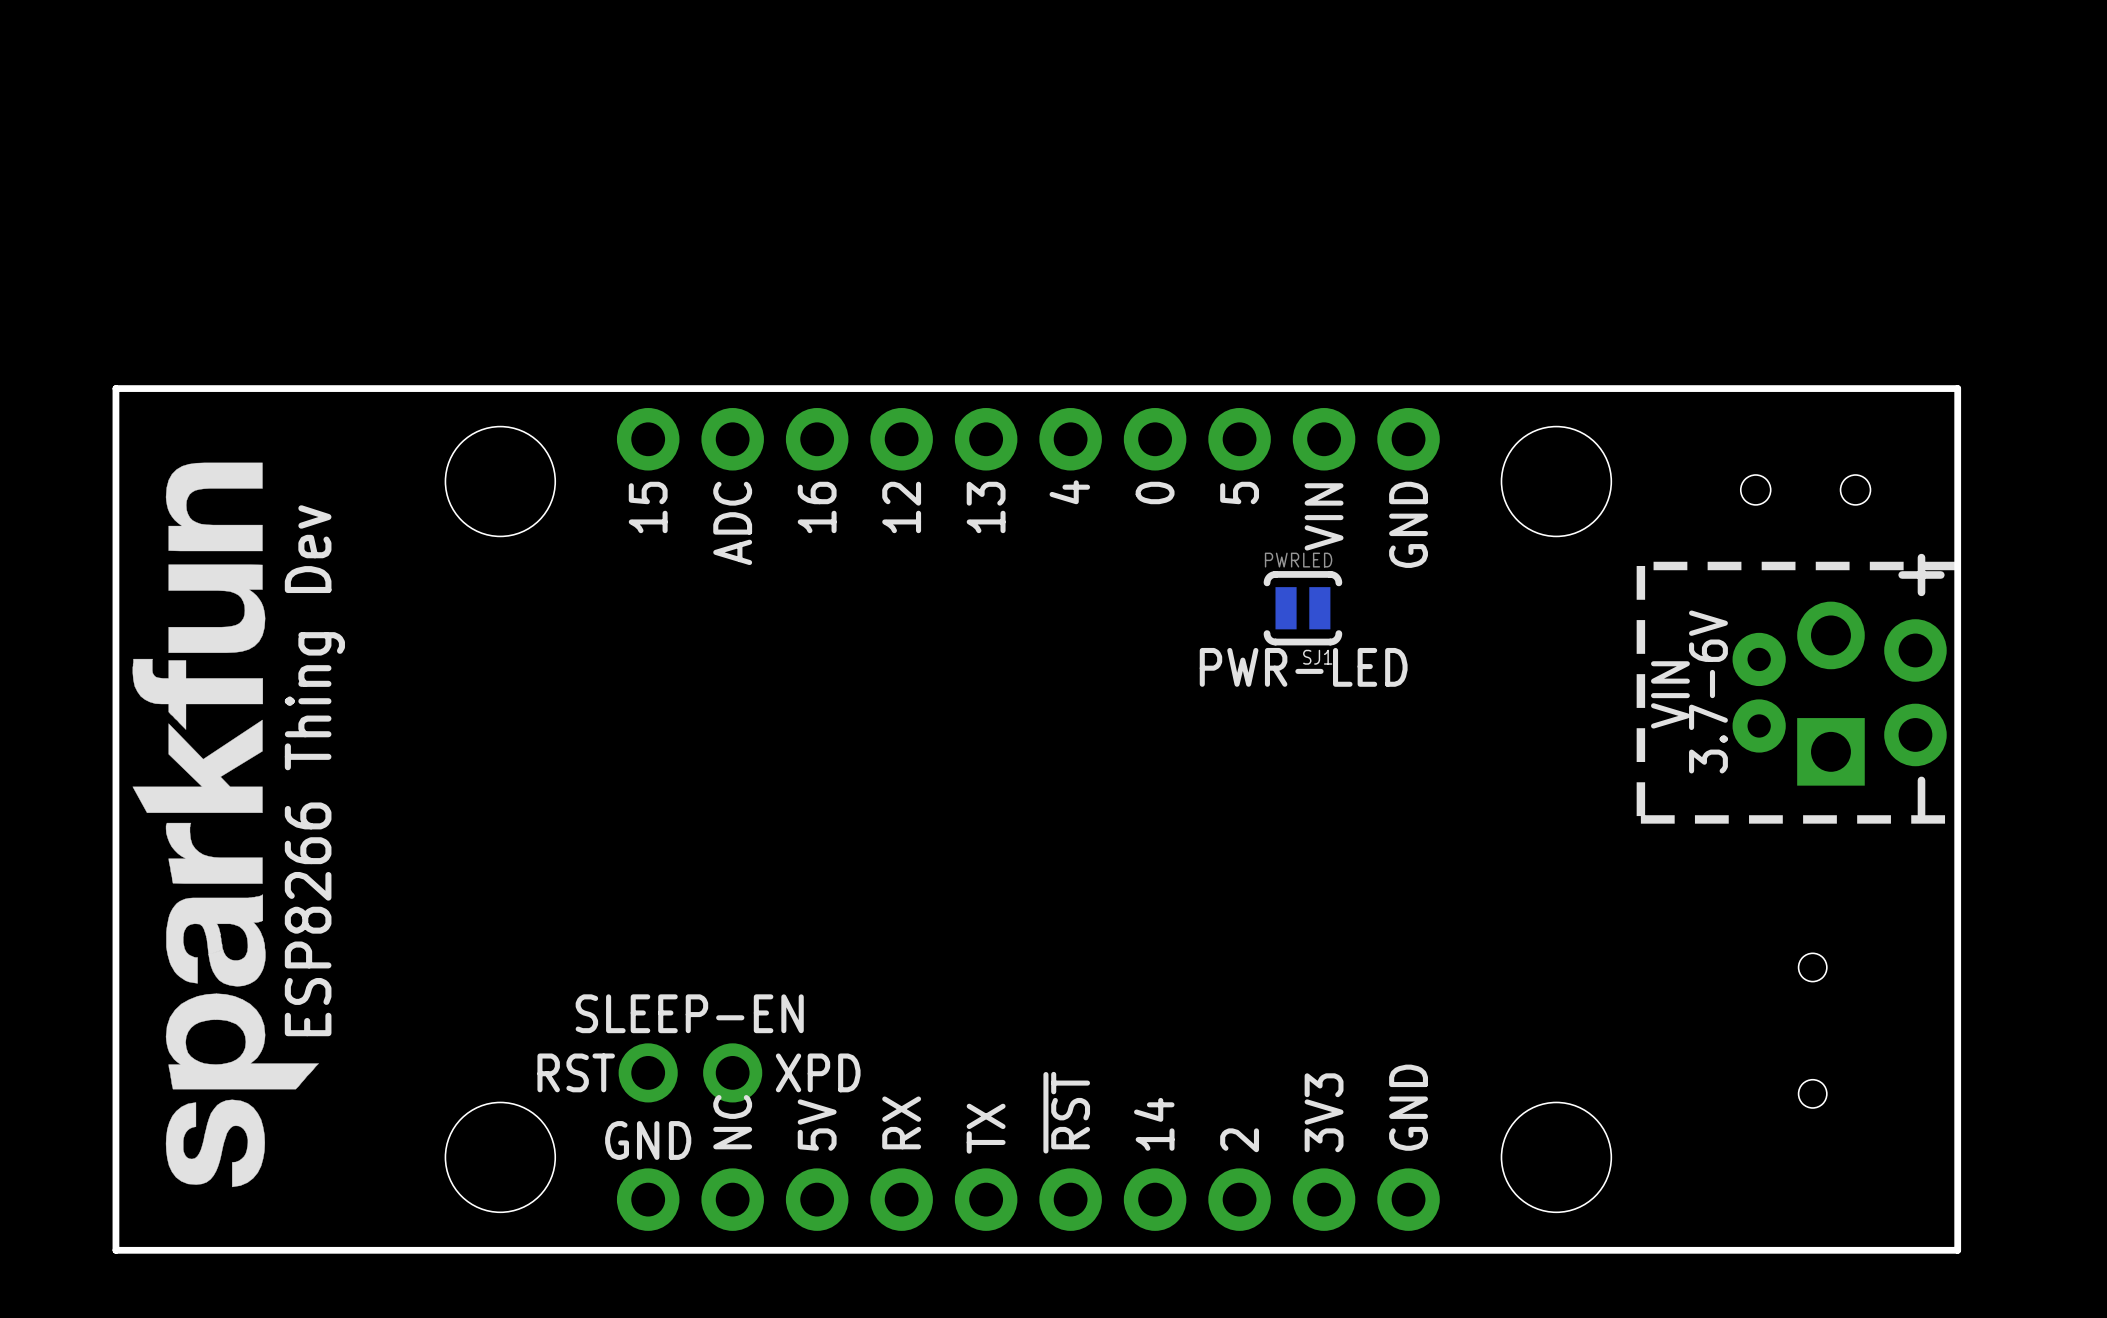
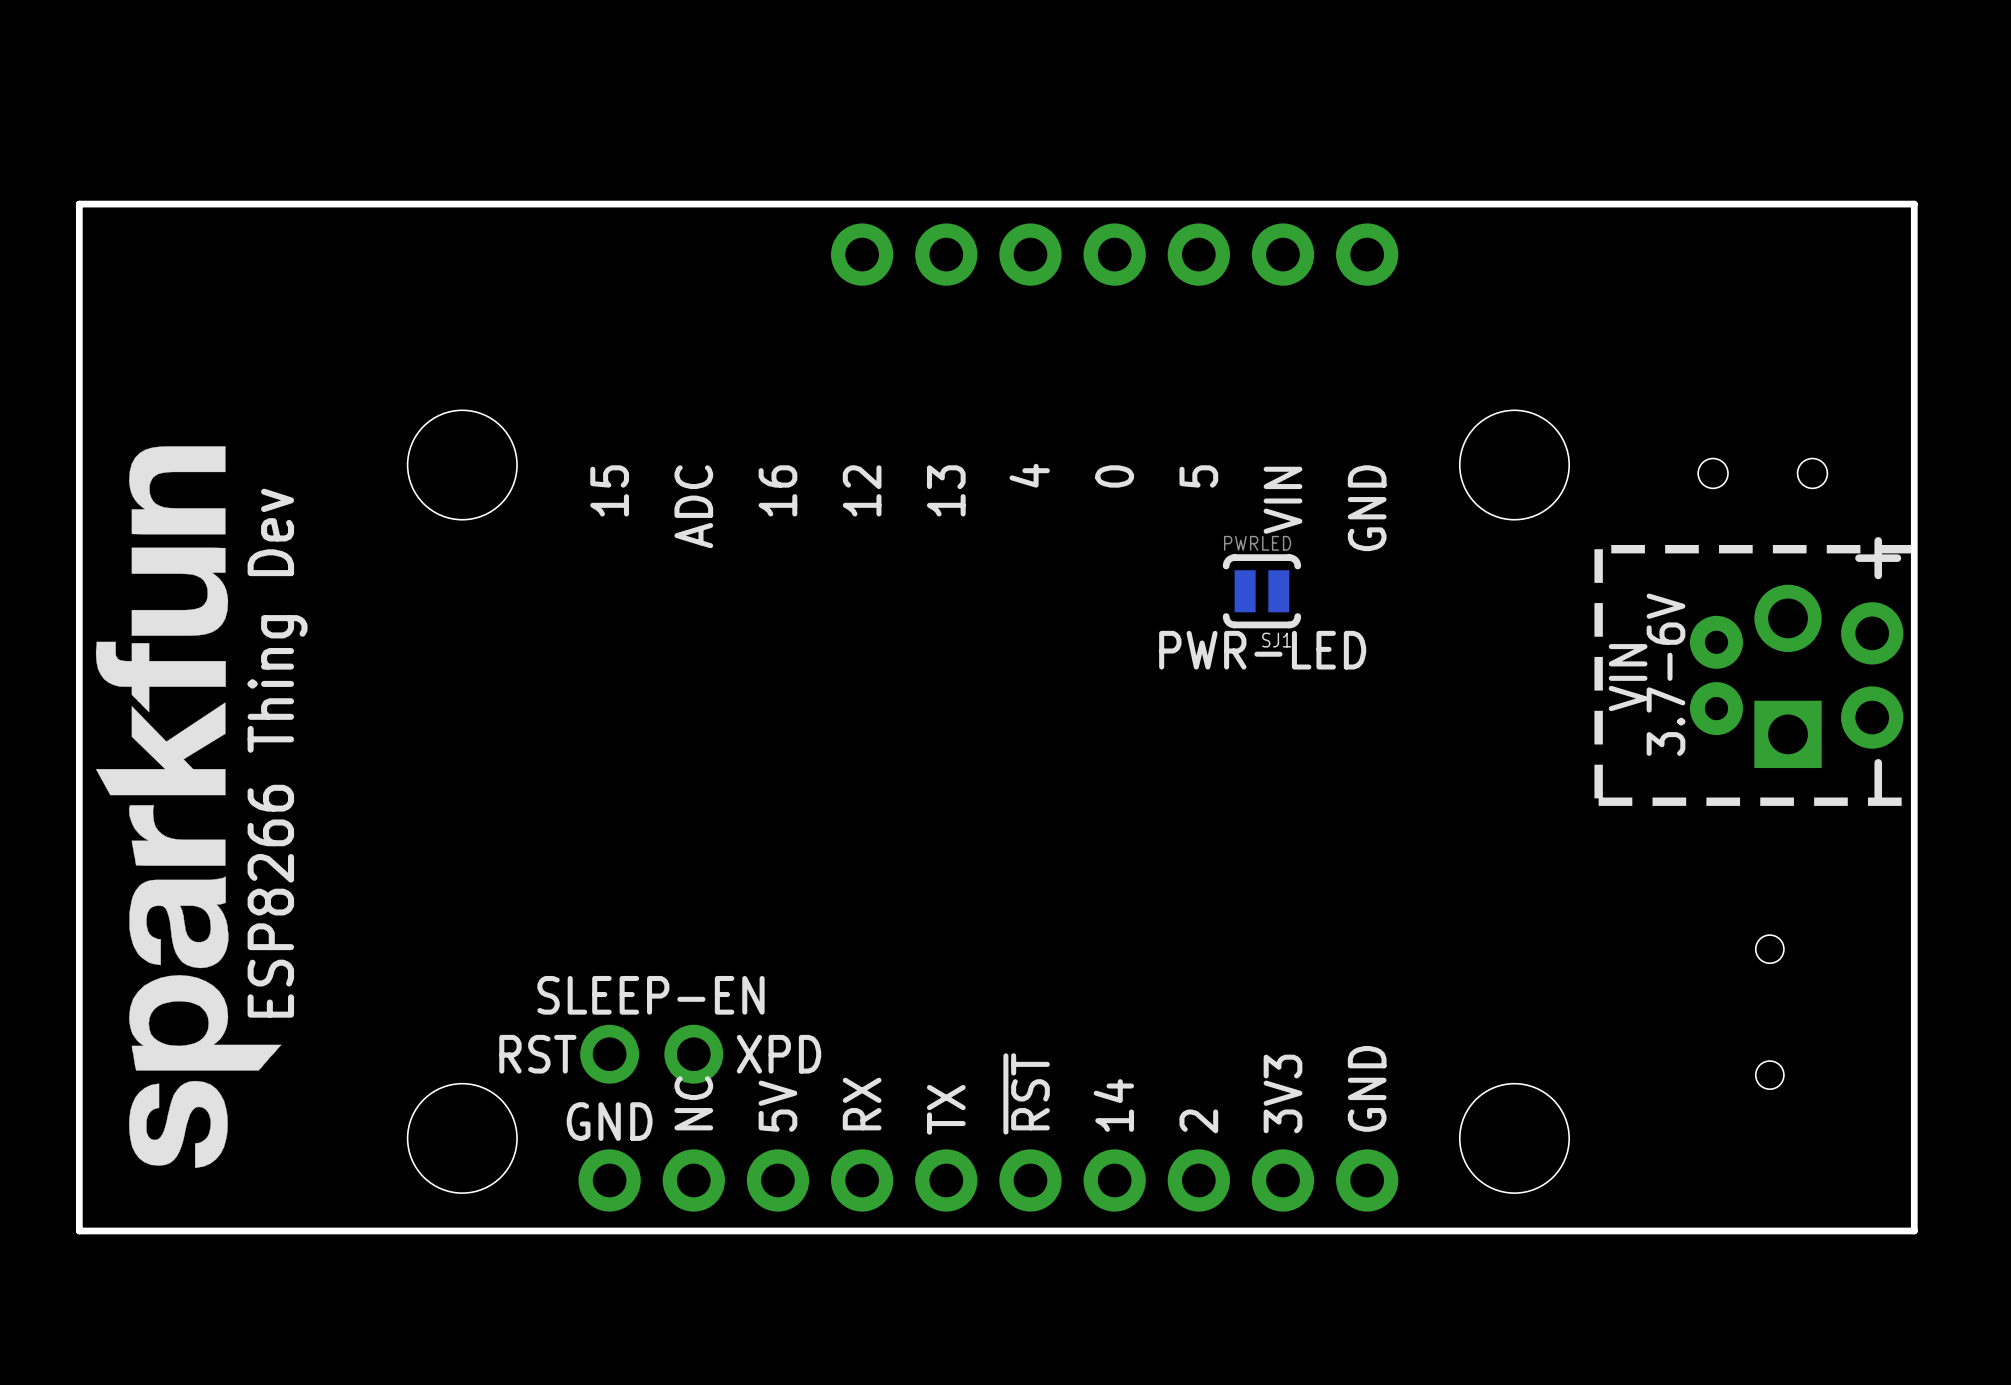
part: none -> (1114, 254)
board edge: (1957, 388) (115, 388) -> (1914, 372) (1914, 204) (79, 204) (79, 372)
part: (1028, 439) -> none

